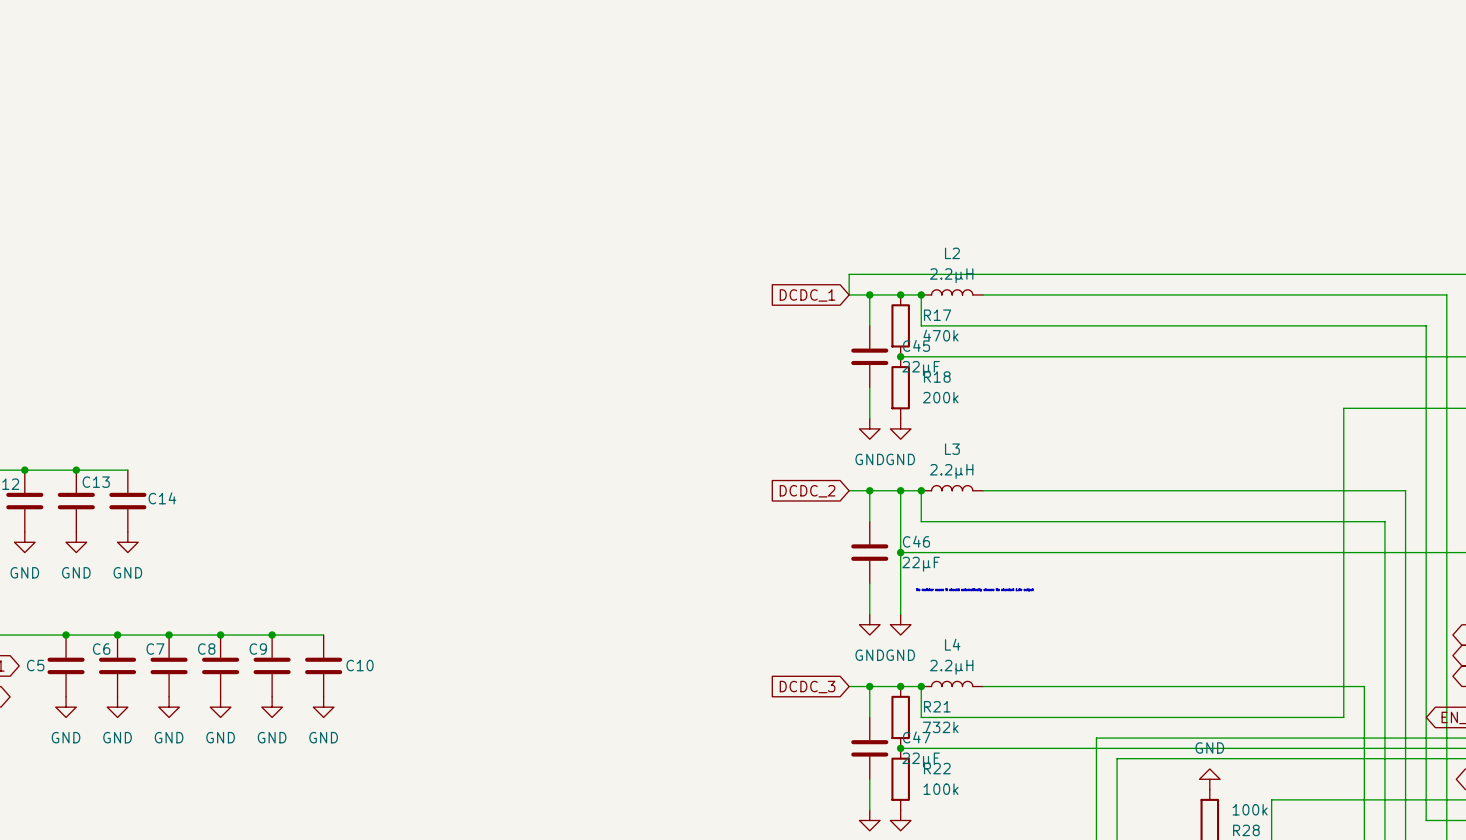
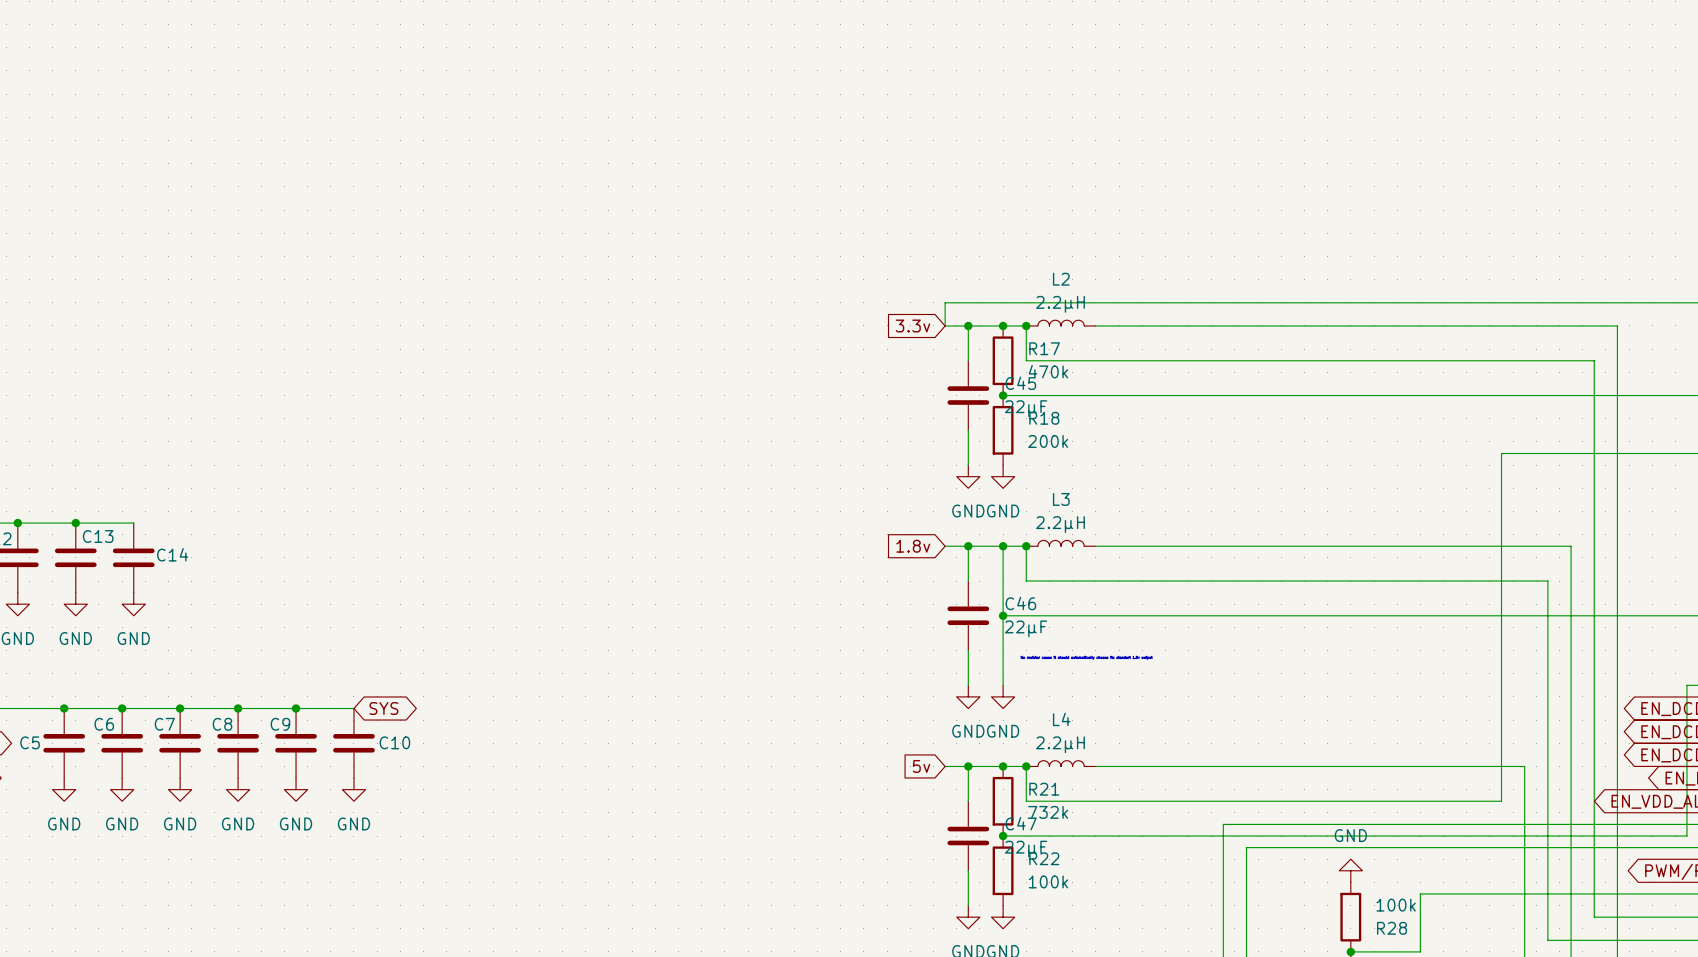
global label: DCDC_1 (807, 295) -> 3.3v (912, 325)
global label: DCDC_2 (807, 491) -> 1.8v (913, 546)
global label: none -> SYS (383, 708)
global label: DCDC_3 (807, 687) -> 5v (921, 766)

